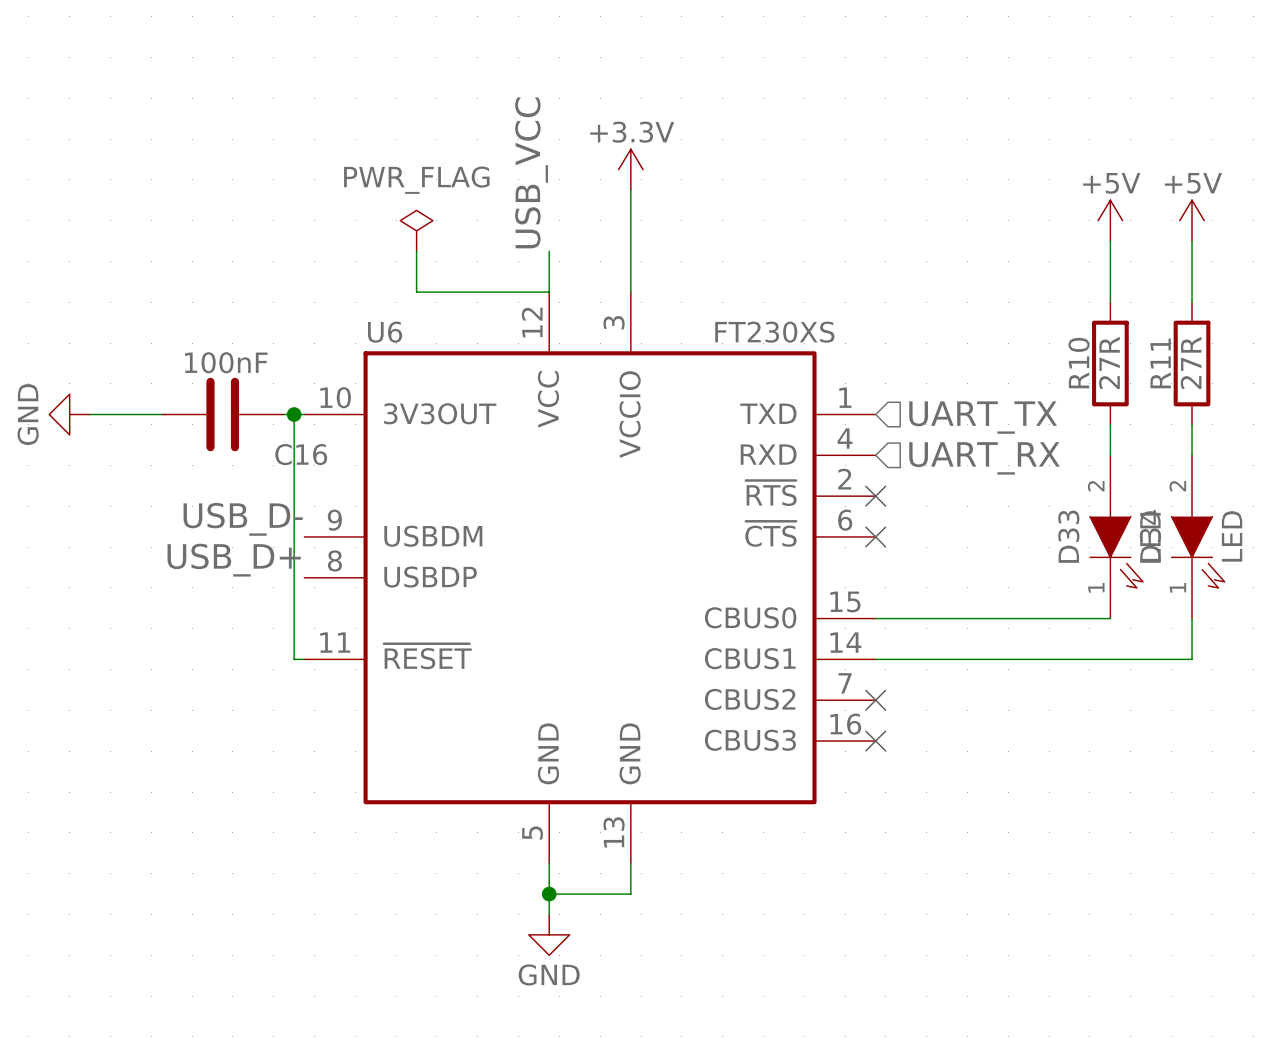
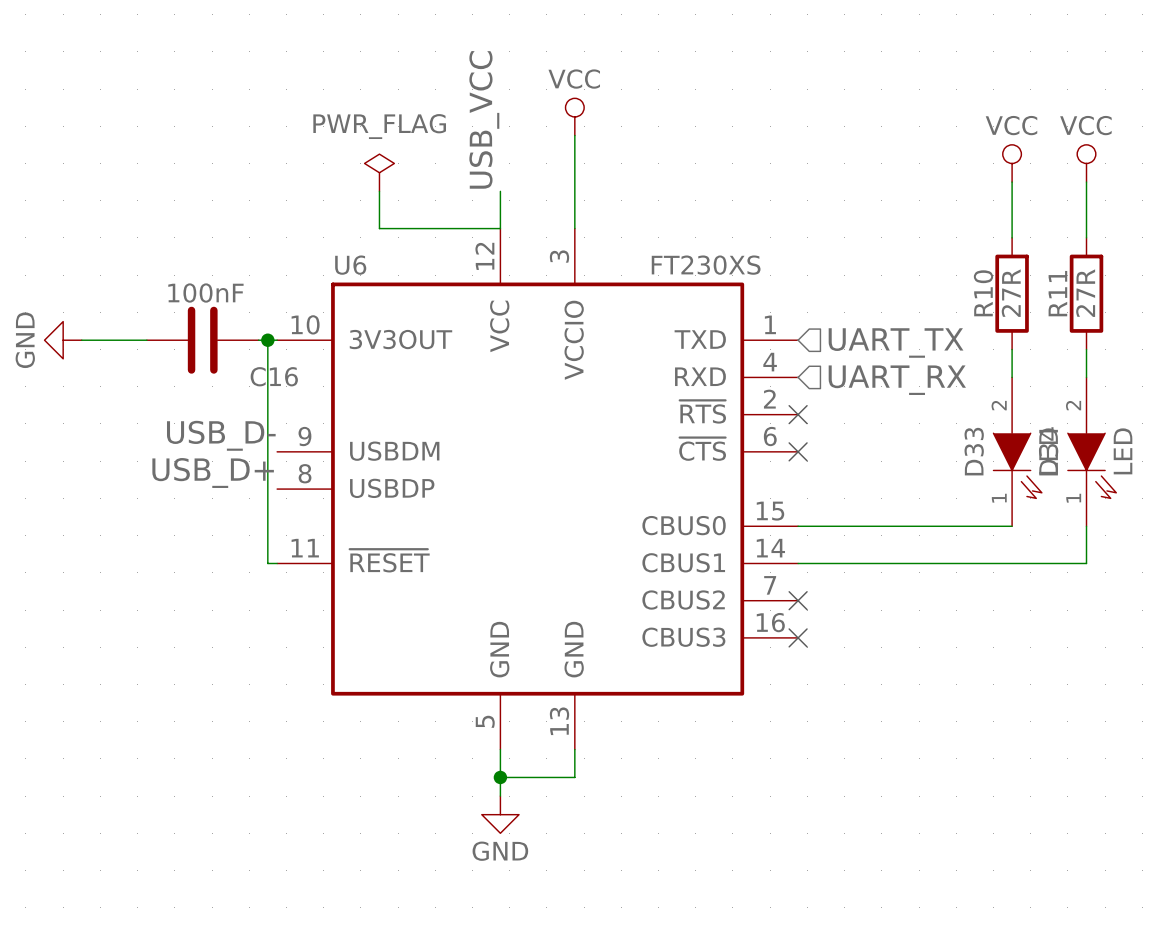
power symbol: +3.3V (630, 169) -> VCC (574, 116)
power symbol: +5V (1110, 220) -> VCC (1012, 163)
power symbol: +5V (1192, 220) -> VCC (1086, 163)

